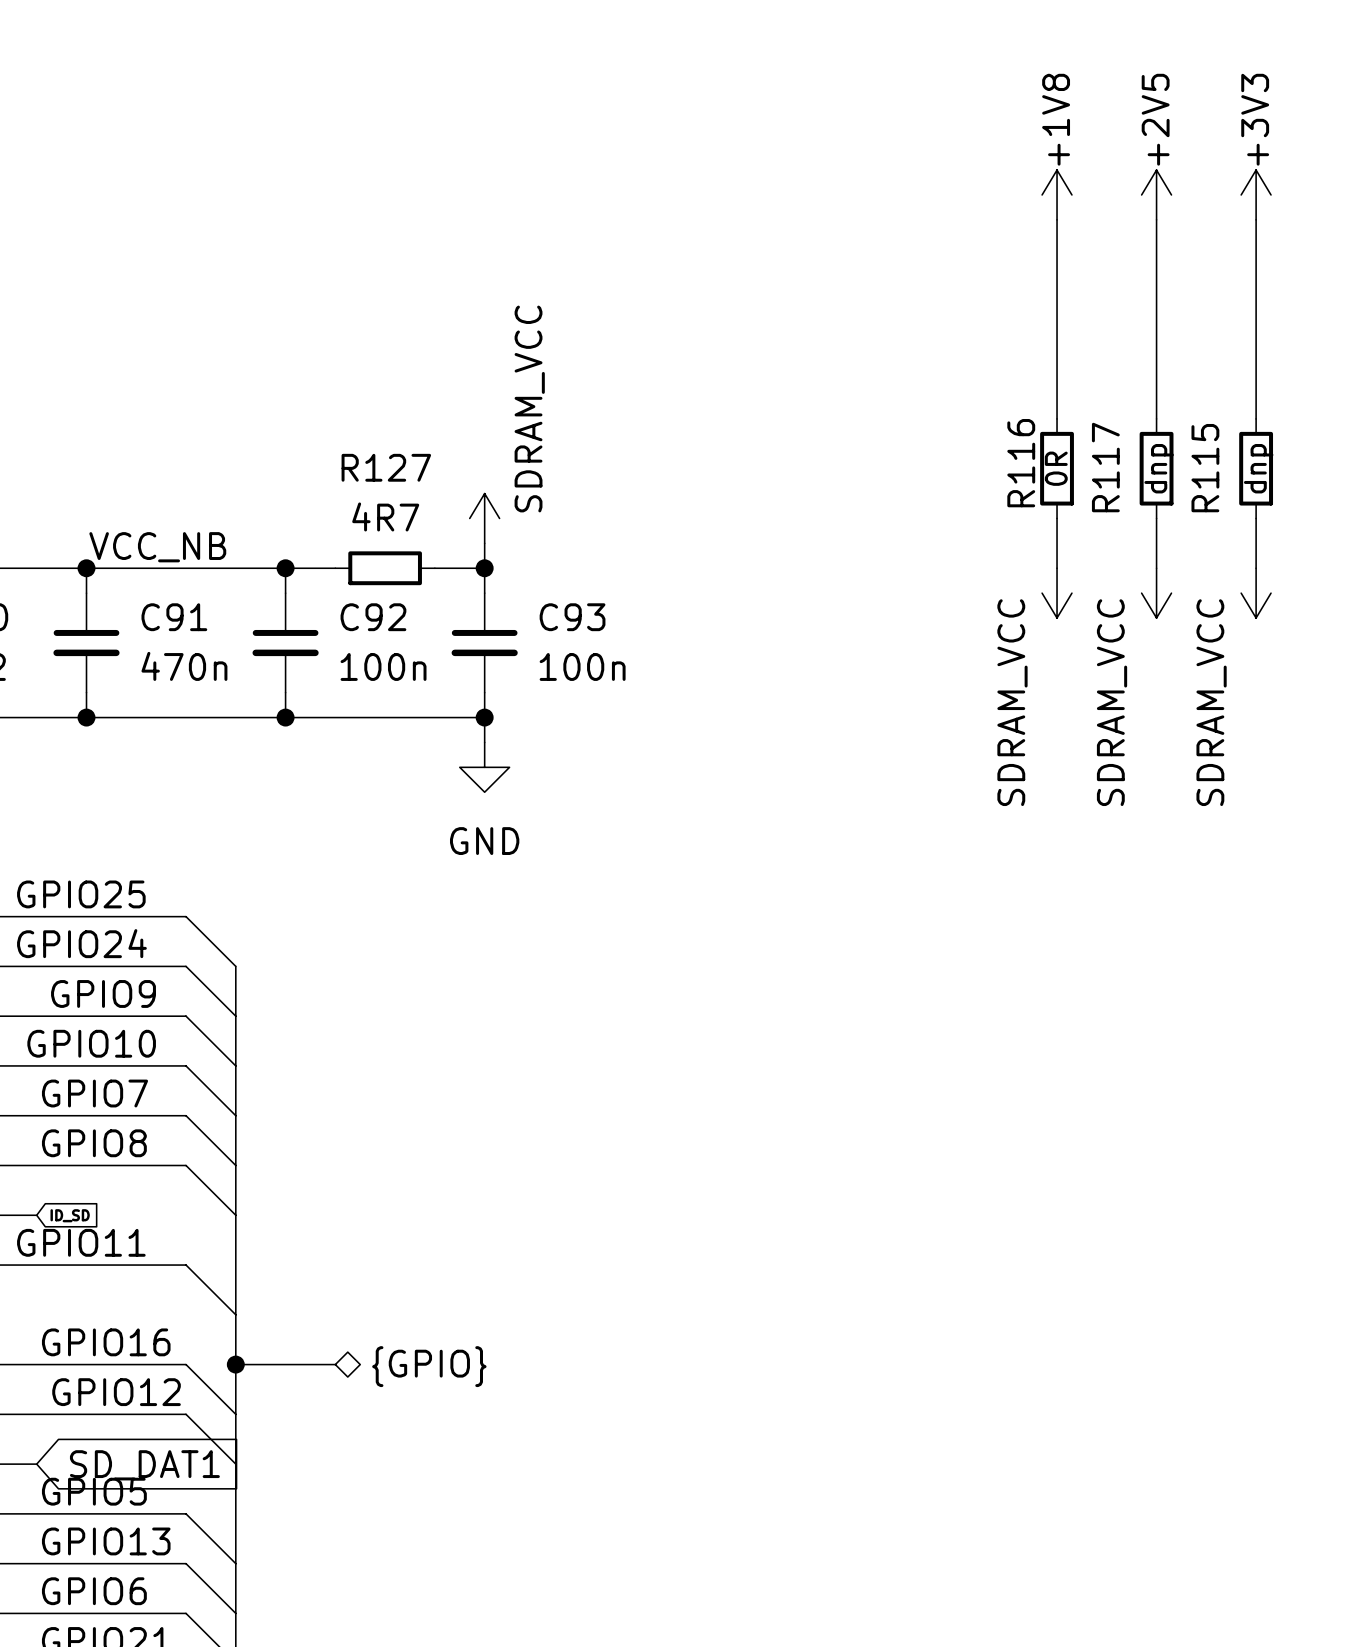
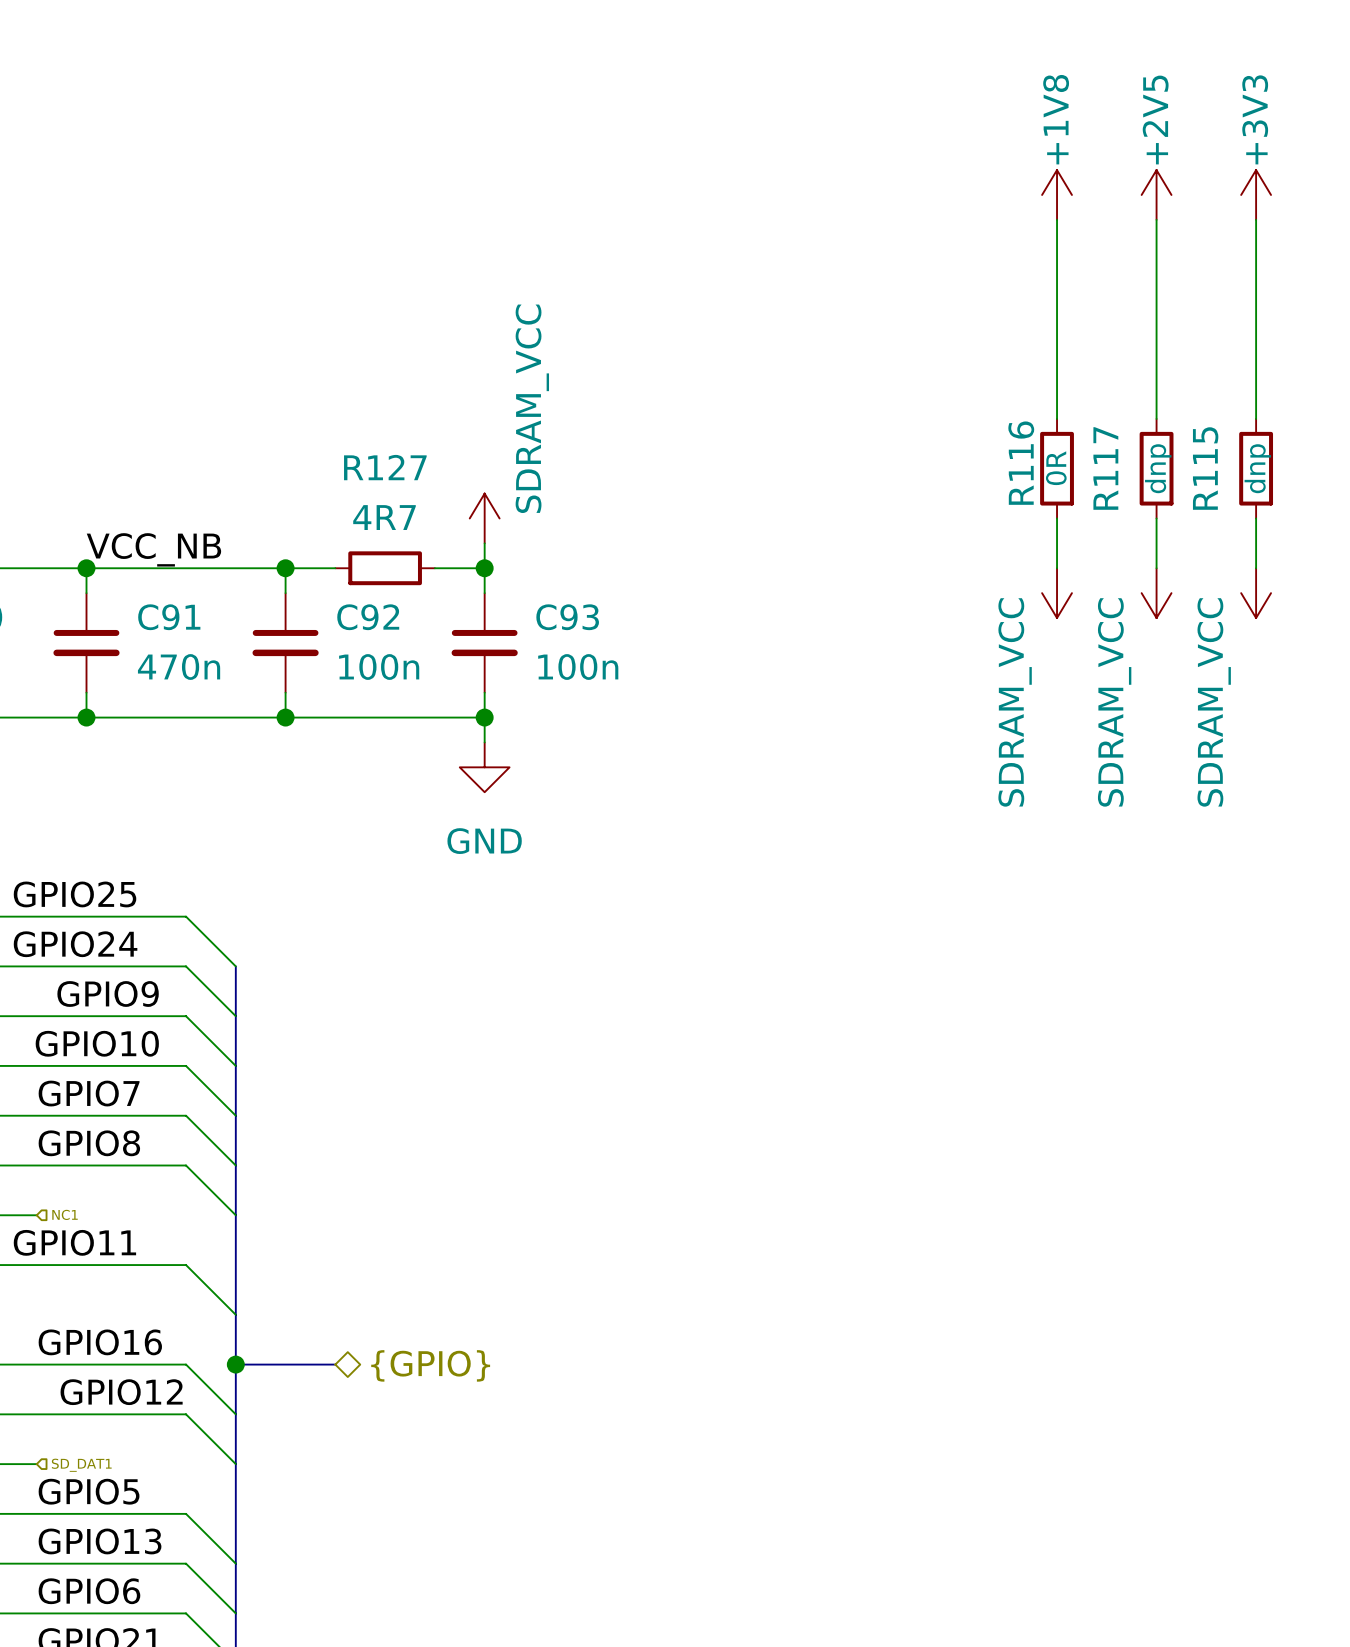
hierarchical label: none -> NC1 (65, 1214)
global label: ID_SD (70, 1215) -> none
hierarchical label: none -> SD_DAT1 (81, 1465)
global label: SD_DAT1 (144, 1465) -> none

